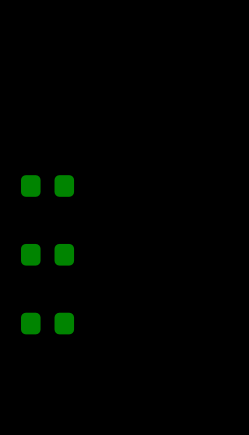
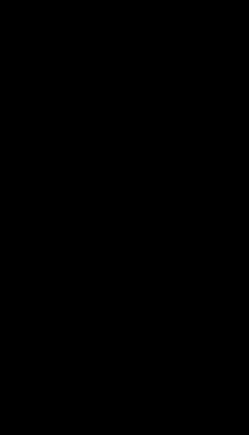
part: (47, 185) -> none
part: (47, 254) -> none
part: (47, 323) -> none

